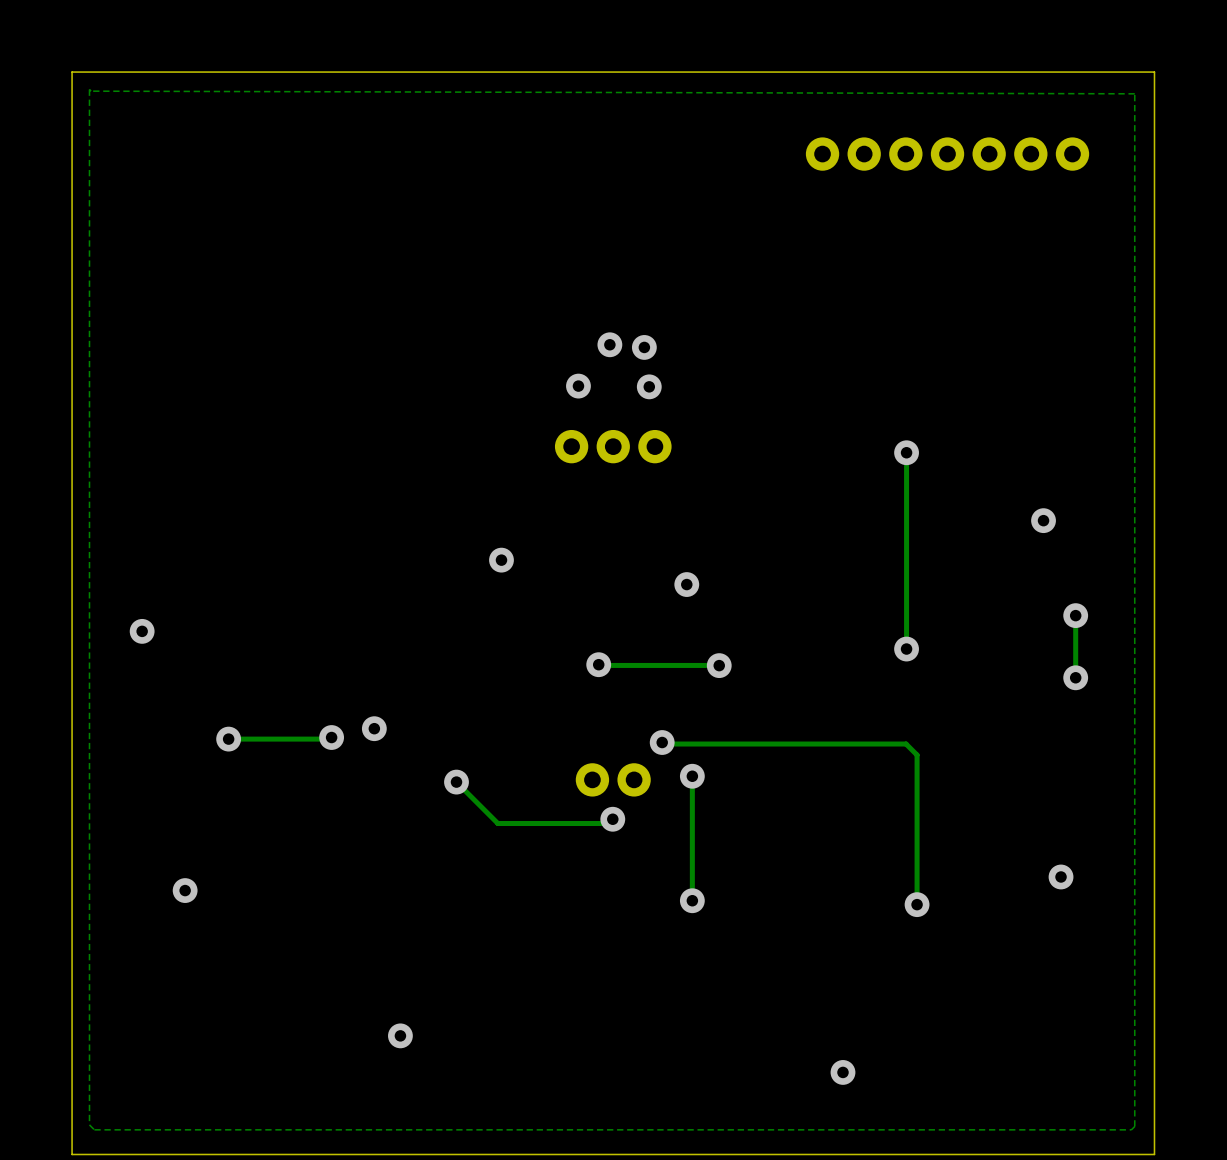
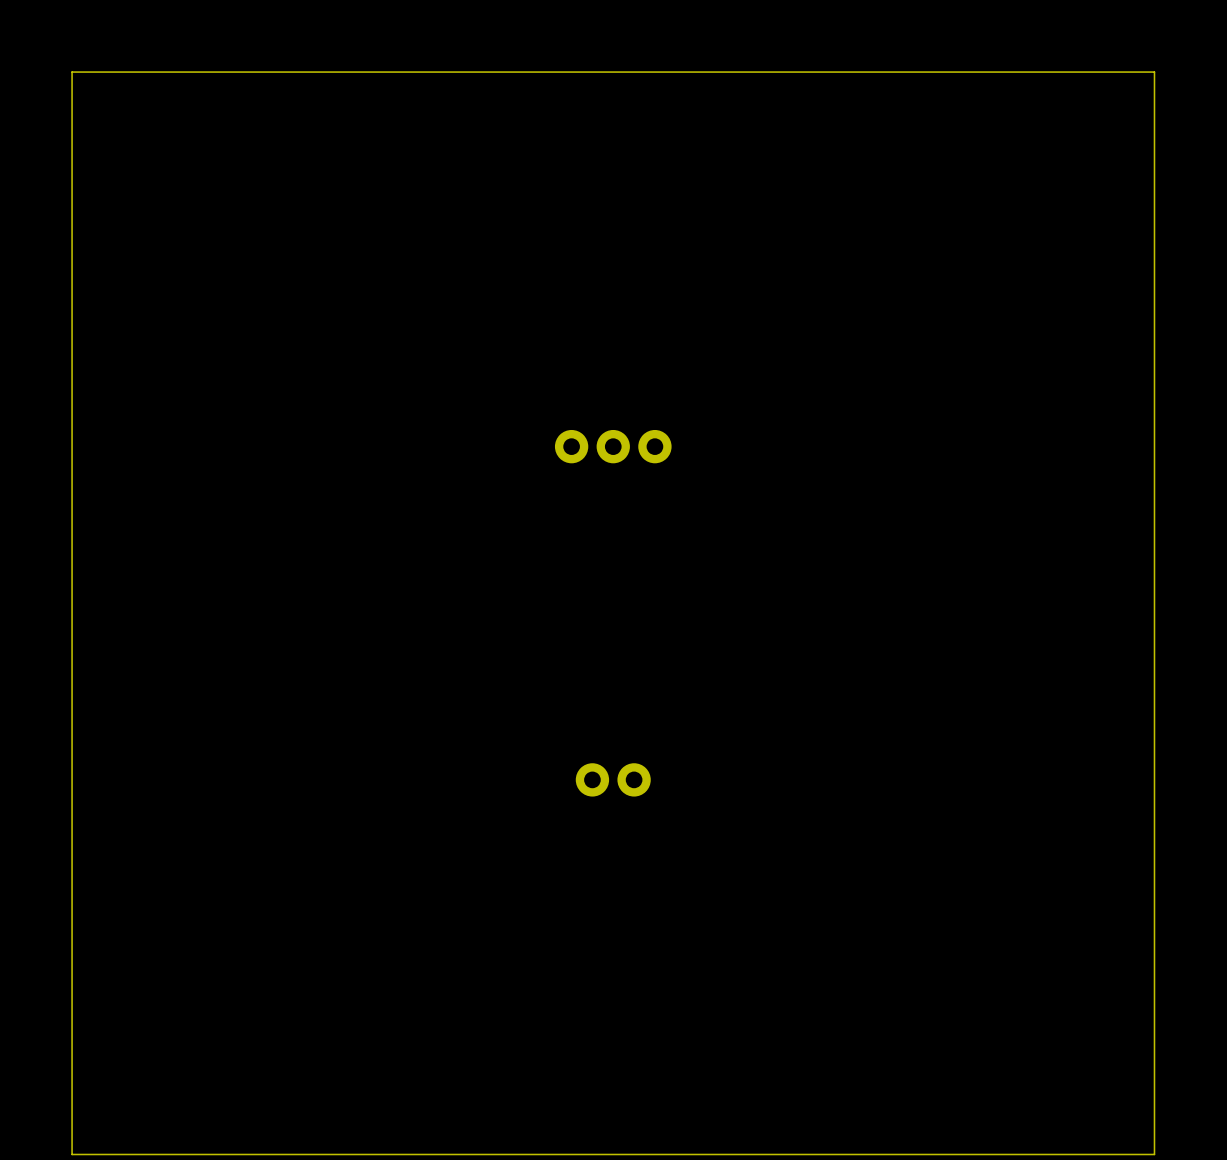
zone outline: (89, 89) (91, 91) (1134, 93) (1134, 1126) (1131, 1129) (94, 1129) (89, 1124) (89, 89) -> none
part: (947, 154) -> none
via: (609, 344) -> none
via: (644, 347) -> none
via: (578, 386) -> none
via: (649, 386) -> none
track: (906, 452) (906, 649) -> none
via: (906, 452) -> none
via: (1043, 520) -> none
via: (501, 560) -> none
via: (686, 584) -> none
track: (1075, 615) (1075, 677) -> none
via: (1075, 615) -> none
via: (142, 631) -> none
via: (906, 649) -> none
track: (598, 664) (719, 665) -> none
via: (598, 664) -> none
via: (719, 665) -> none
via: (1075, 677) -> none
via: (374, 728) -> none
track: (331, 737) (330, 739) (228, 739) -> none
via: (331, 737) -> none
via: (228, 739) -> none
track: (662, 742) (906, 744) (917, 755) (917, 904) -> none
via: (662, 742) -> none
track: (692, 776) (692, 900) -> none
via: (692, 776) -> none
track: (456, 782) (497, 823) (605, 823) (612, 819) -> none
via: (456, 782) -> none
via: (612, 819) -> none
via: (1061, 876) -> none
via: (185, 890) -> none
via: (692, 900) -> none
via: (917, 904) -> none
via: (400, 1035) -> none
via: (842, 1072) -> none

